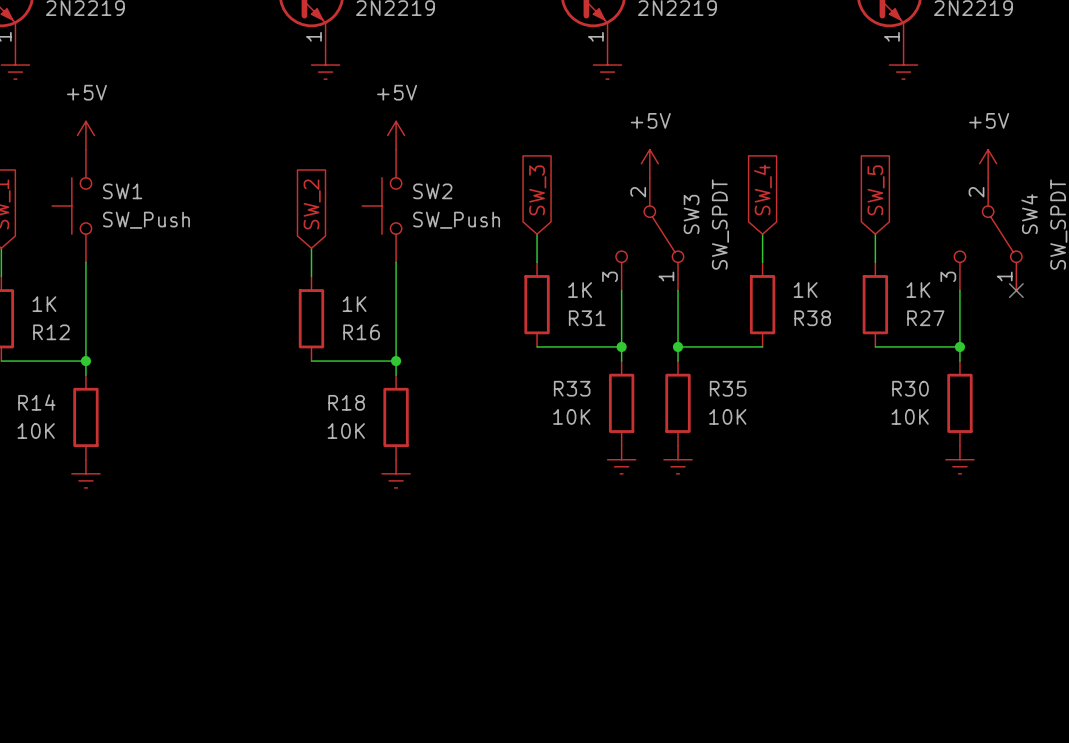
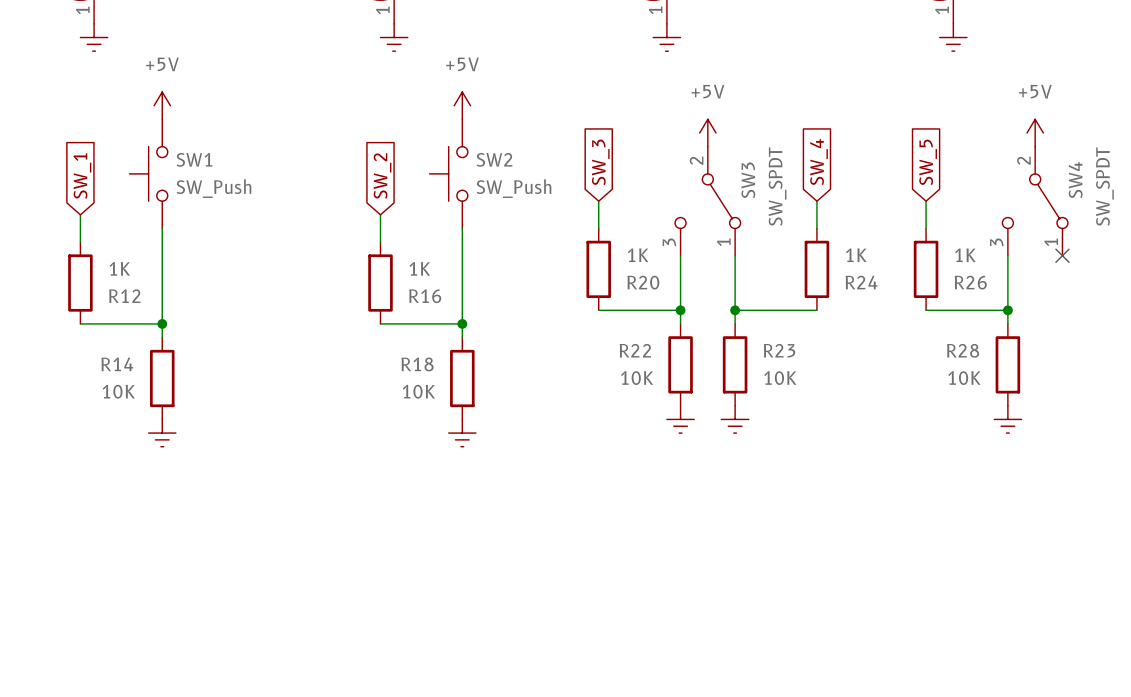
R31 name: R31 (587, 318) -> R20 (643, 282)
R38 name: R38 (812, 318) -> R24 (861, 282)
R27 name: R27 (925, 318) -> R26 (970, 282)
R33 name: R33 (572, 388) -> R22 (635, 350)
R35 name: R35 (728, 388) -> R23 (779, 350)
R30 name: R30 (910, 388) -> R28 (963, 350)

